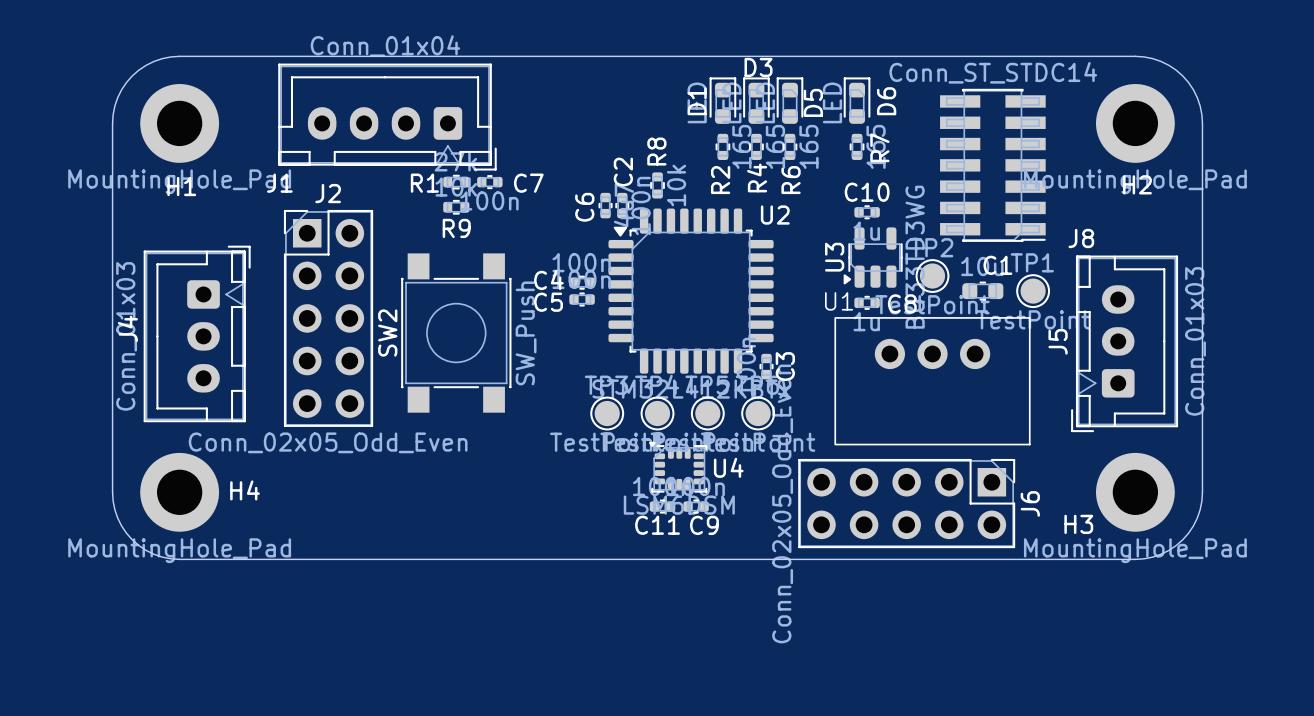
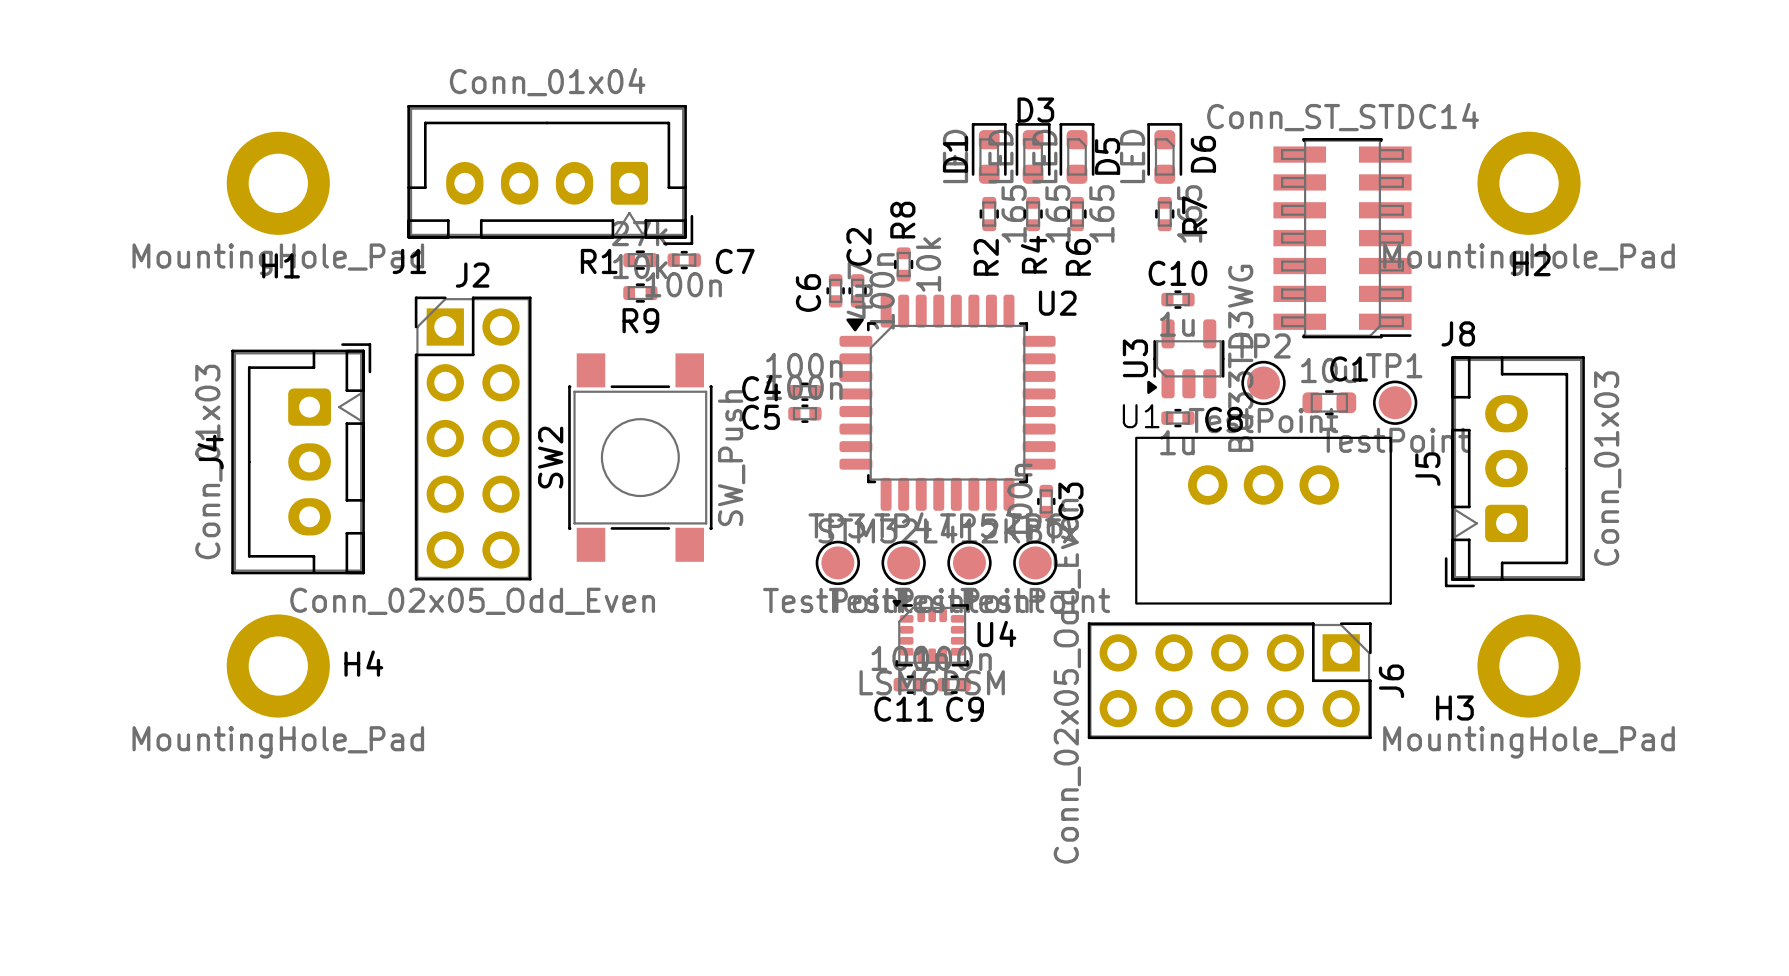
board edge: (179, 56) (1135, 56) (1161, 61) (1176, 70) (1188, 82) (1197, 97) (1201, 114) (1202, 492) (1197, 517) (1182, 539) (1168, 550) (1152, 557) (1135, 559) (179, 559) (153, 554) (138, 545) (126, 533) (117, 517) (113, 501) (112, 123) (117, 97) (132, 76) (153, 61) (179, 56) -> none

